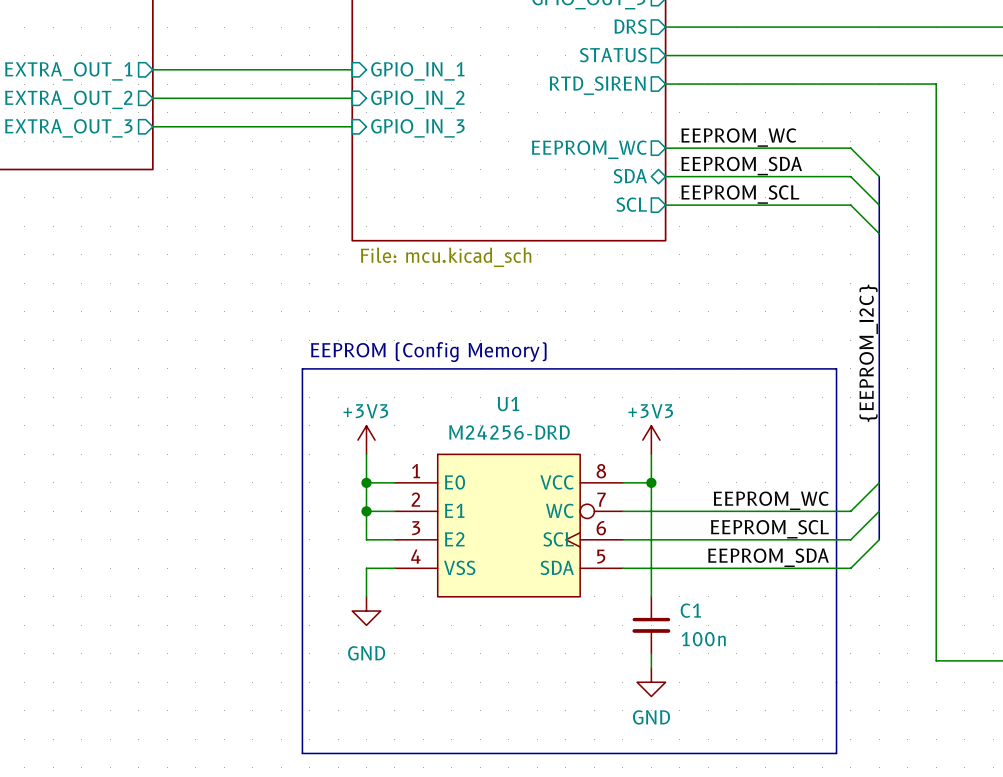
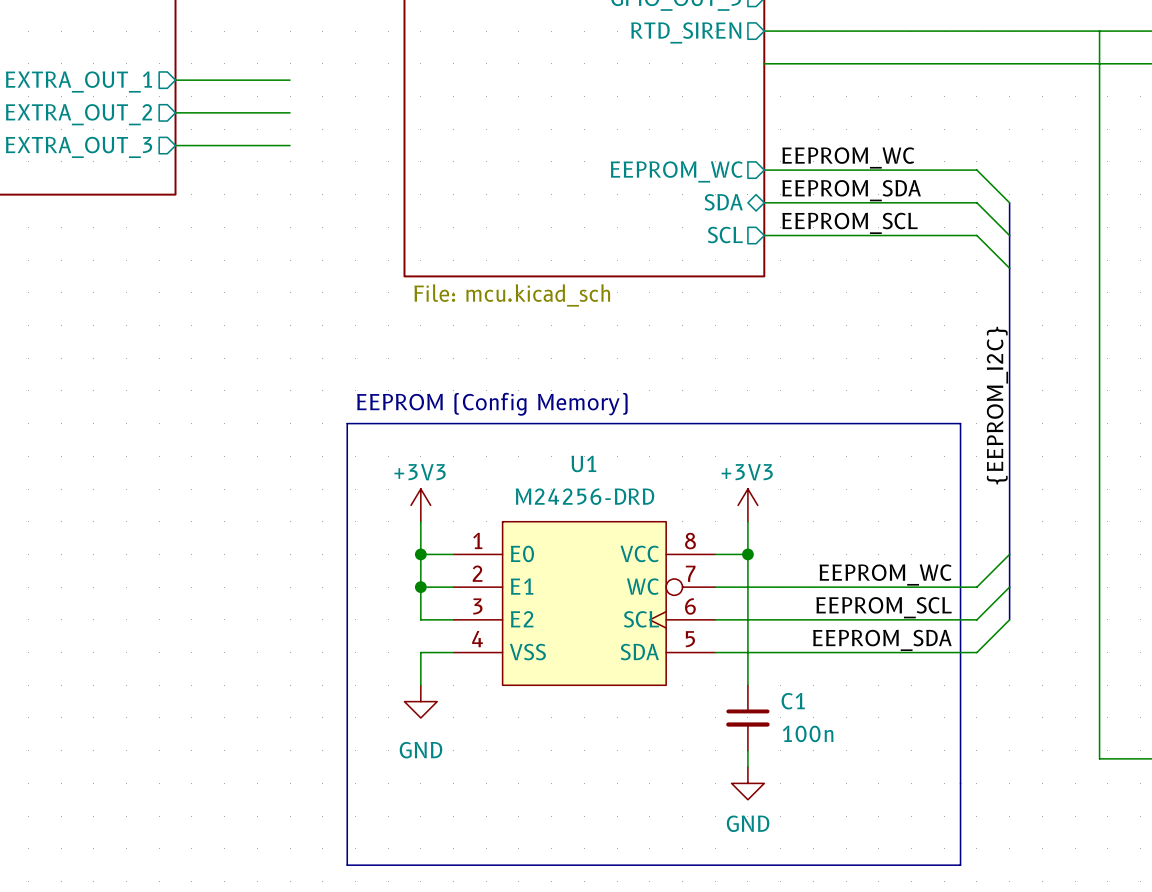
sheet pin: DRS (630, 26) -> RTD_SIREN (686, 32)
sheet pin: STATUS (613, 55) -> none
wire: (252, 69) (352, 69) -> none
sheet pin: GPIO_IN_1 (417, 71) -> none
wire: (665, 84) (936, 84) (936, 660) (957, 660) -> (1099, 31) (1099, 758)
sheet pin: RTD_SIREN (597, 85) -> none
wire: (252, 98) (352, 98) -> none
sheet pin: GPIO_IN_2 (417, 99) -> none
wire: (252, 126) (352, 126) -> none
sheet pin: GPIO_IN_3 (417, 128) -> none

